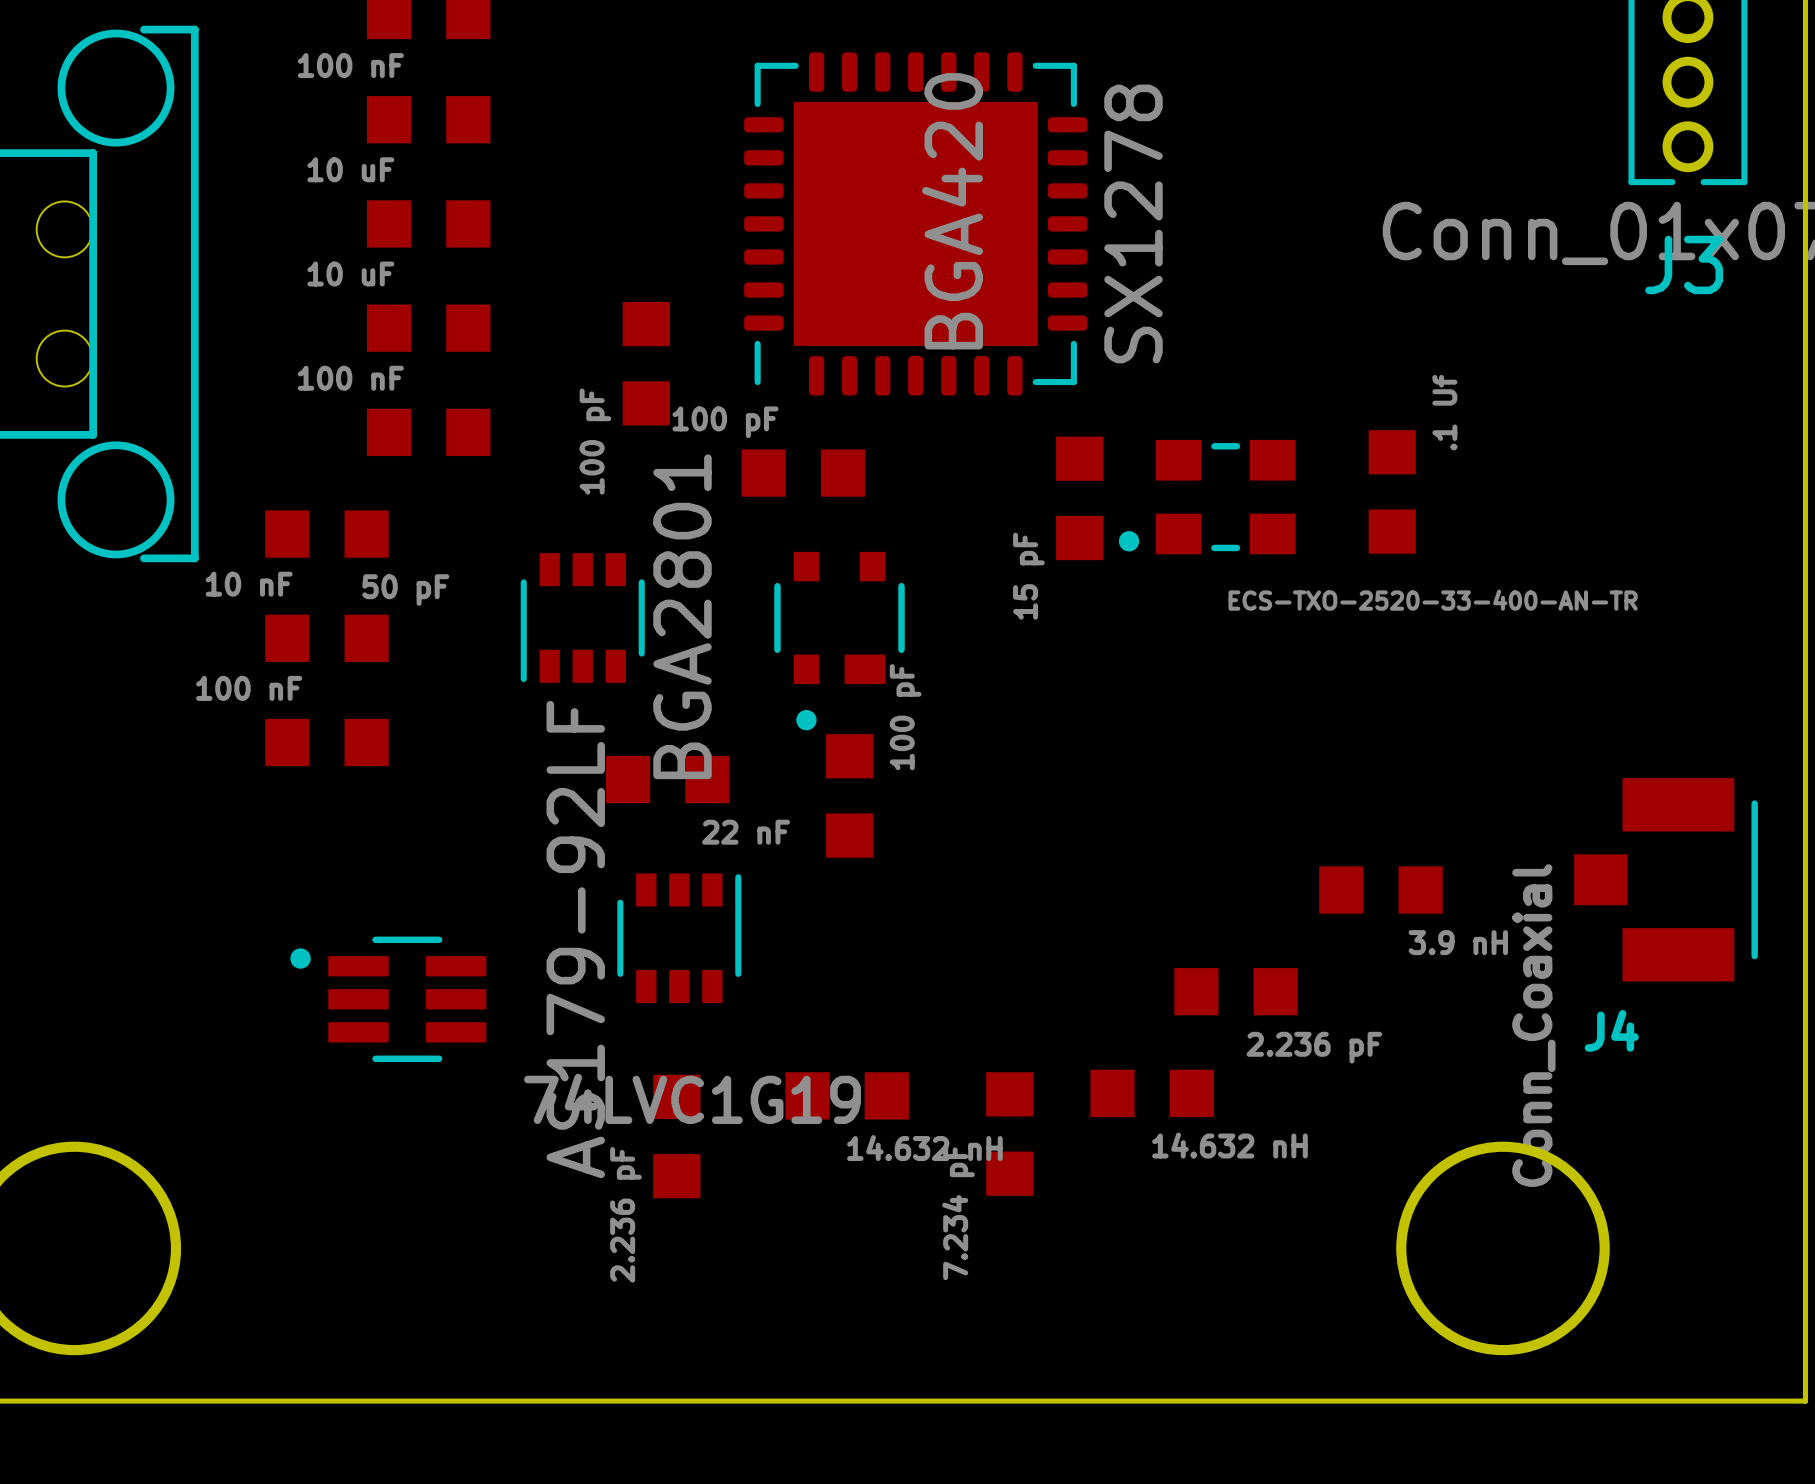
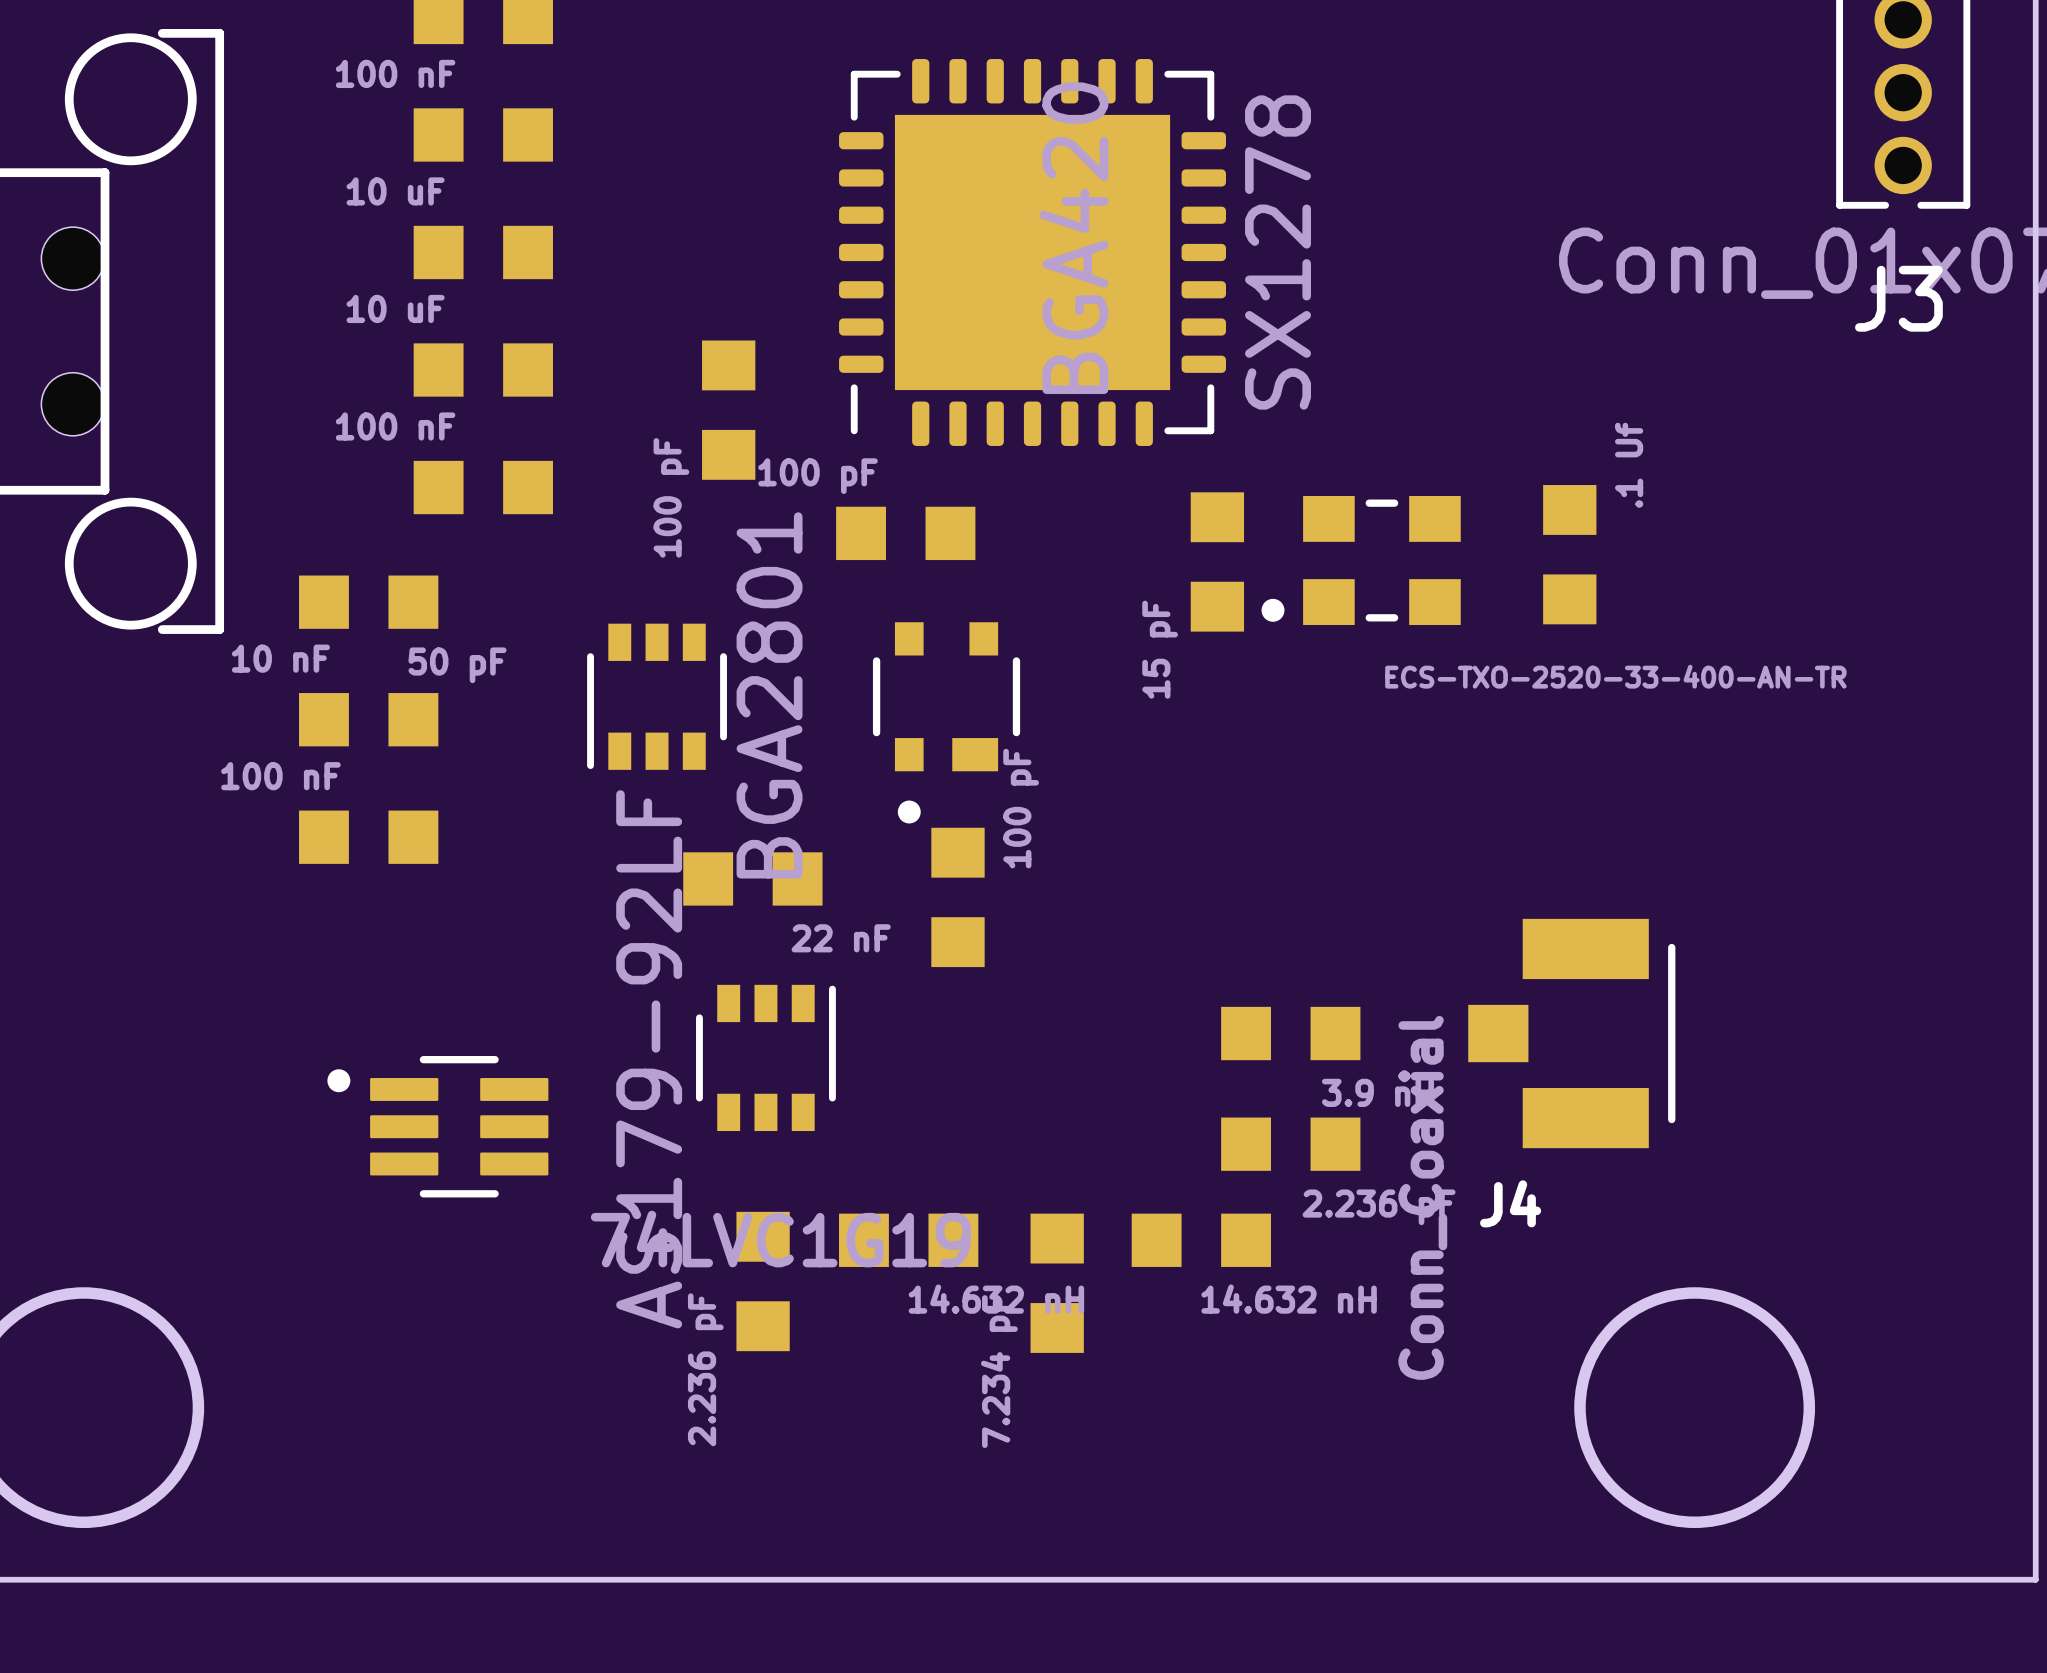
J4 position: (1666, 879) -> (1571, 1033)
part position: (1380, 889) -> (1290, 1033)
part position: (1236, 991) -> (1290, 1144)
part position: (1152, 1093) -> (1201, 1240)
part position: (847, 1095) -> (908, 1240)
part position: (1009, 1134) -> (1057, 1283)

